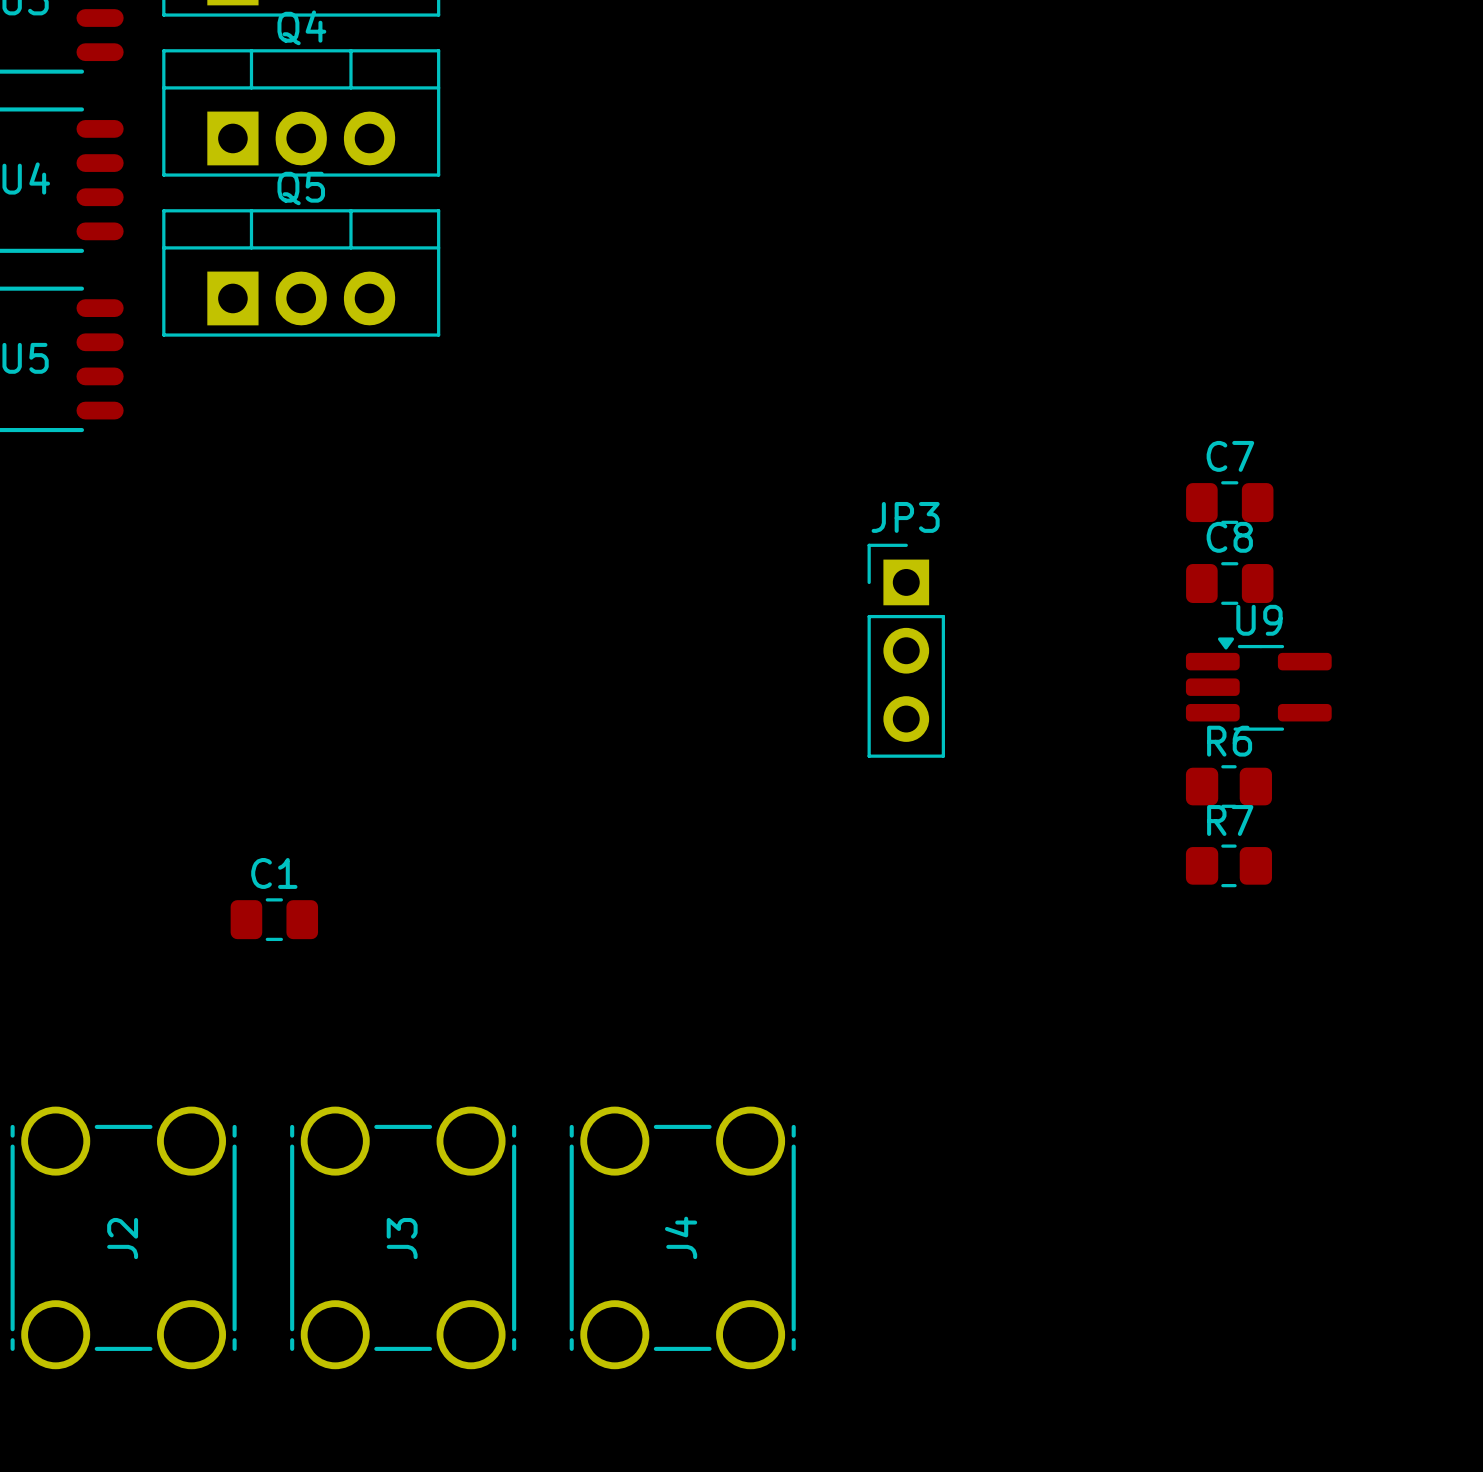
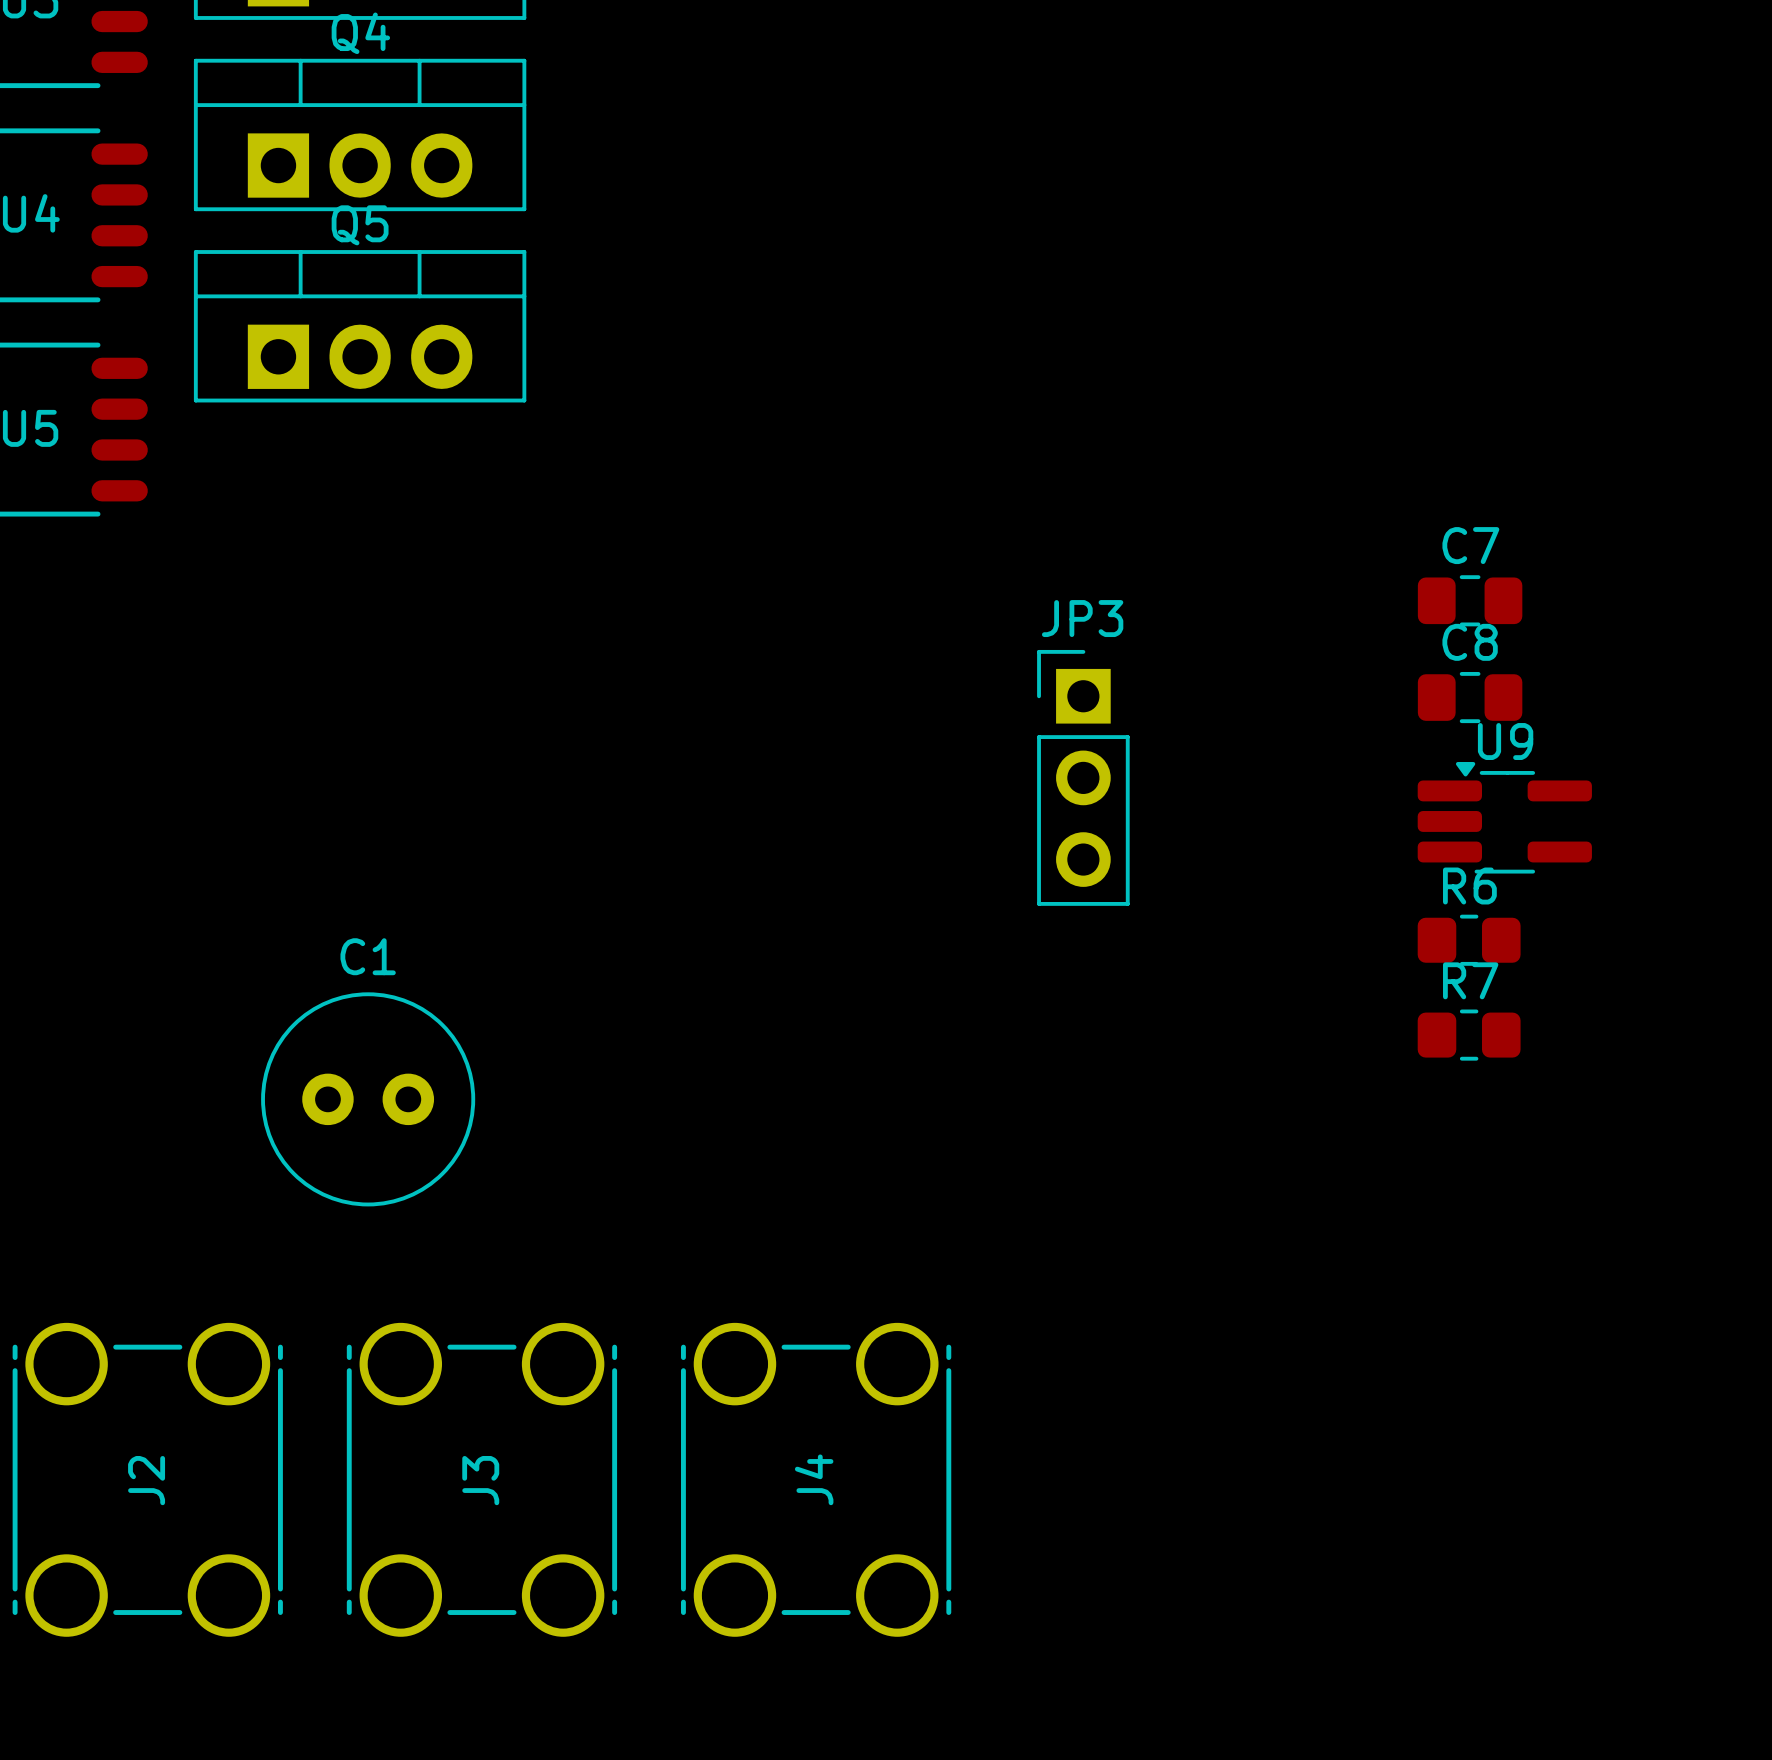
C1 name position: C1 (274, 873) -> C1 (368, 956)
C1 footprint: [230, 898, 319, 942] -> [261, 992, 476, 1207]

